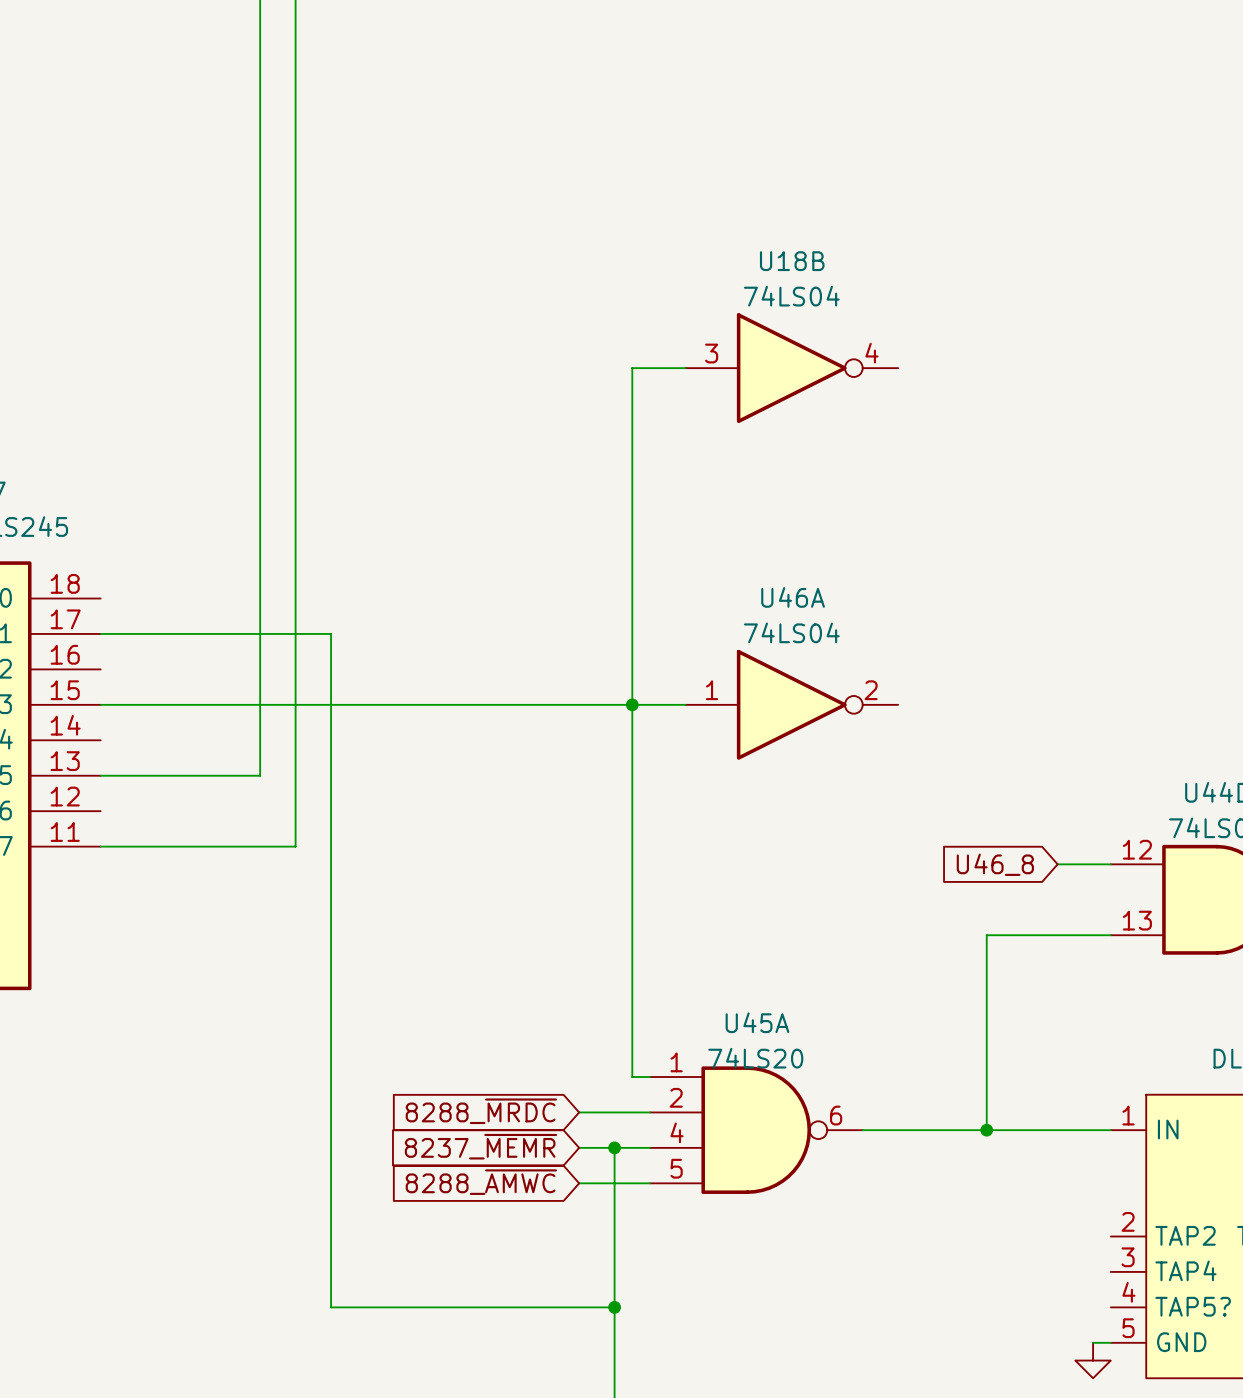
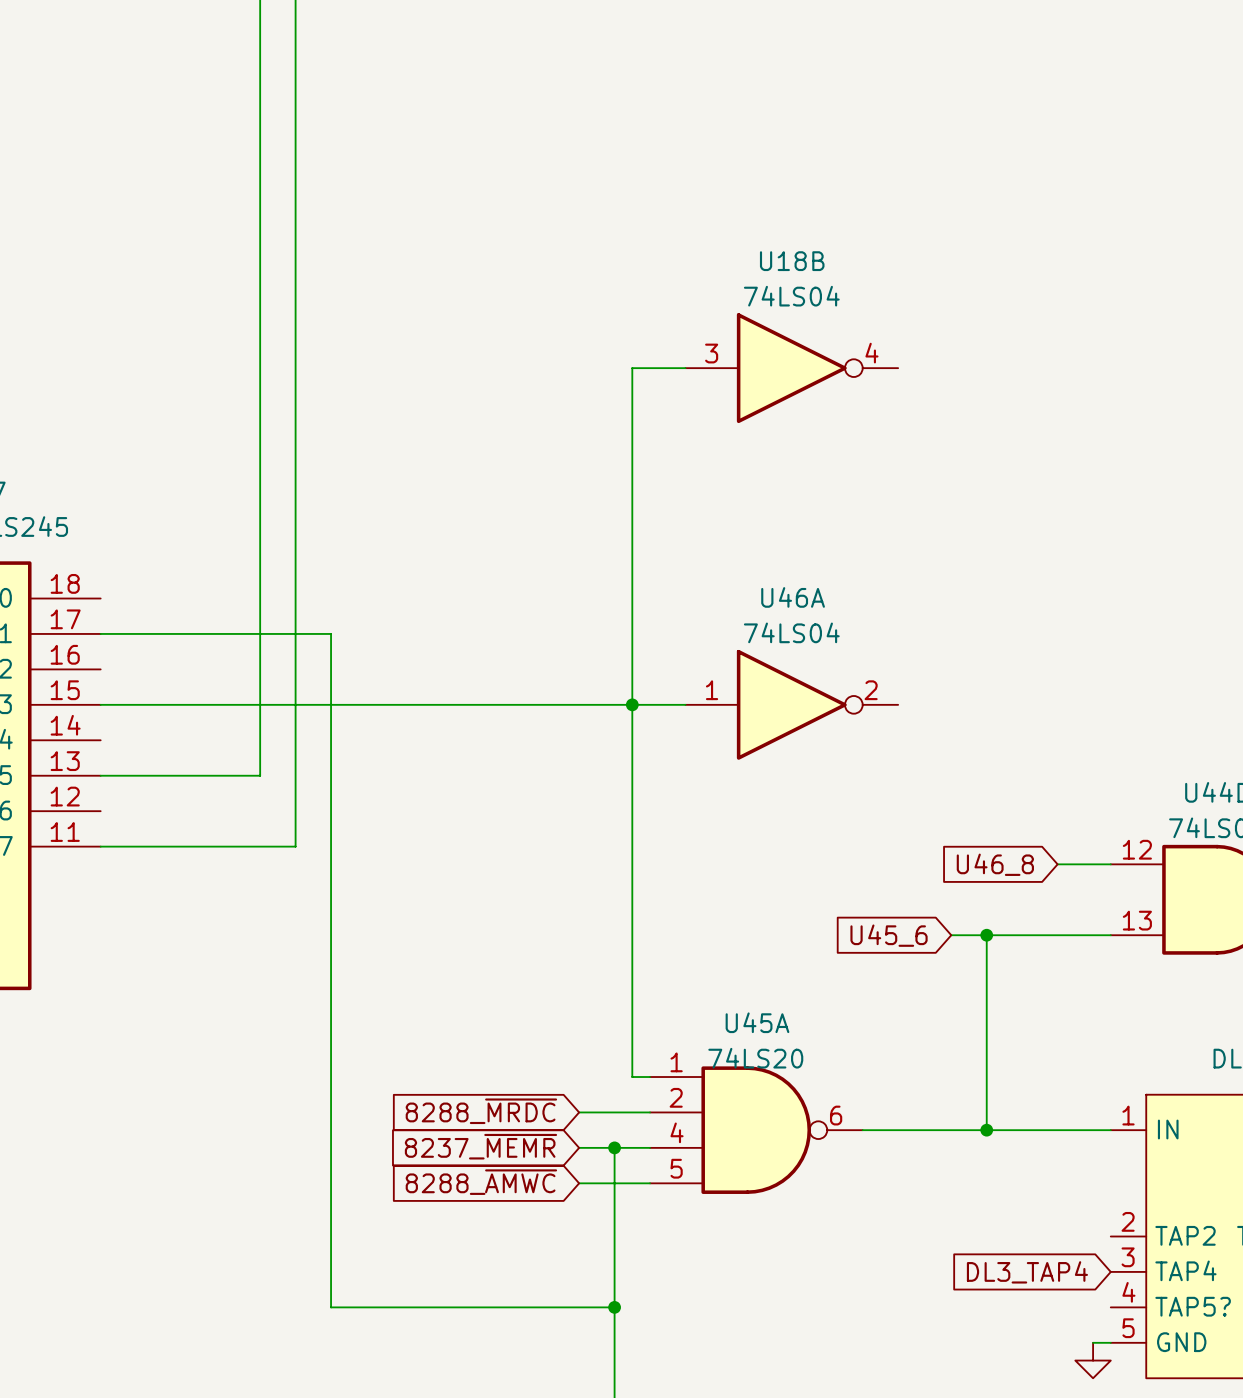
global label: none -> U45_6 (889, 935)
wire: none -> (951, 935) (986, 935)
junction: none -> (986, 935)
global label: none -> DL3_TAP4 (1027, 1272)

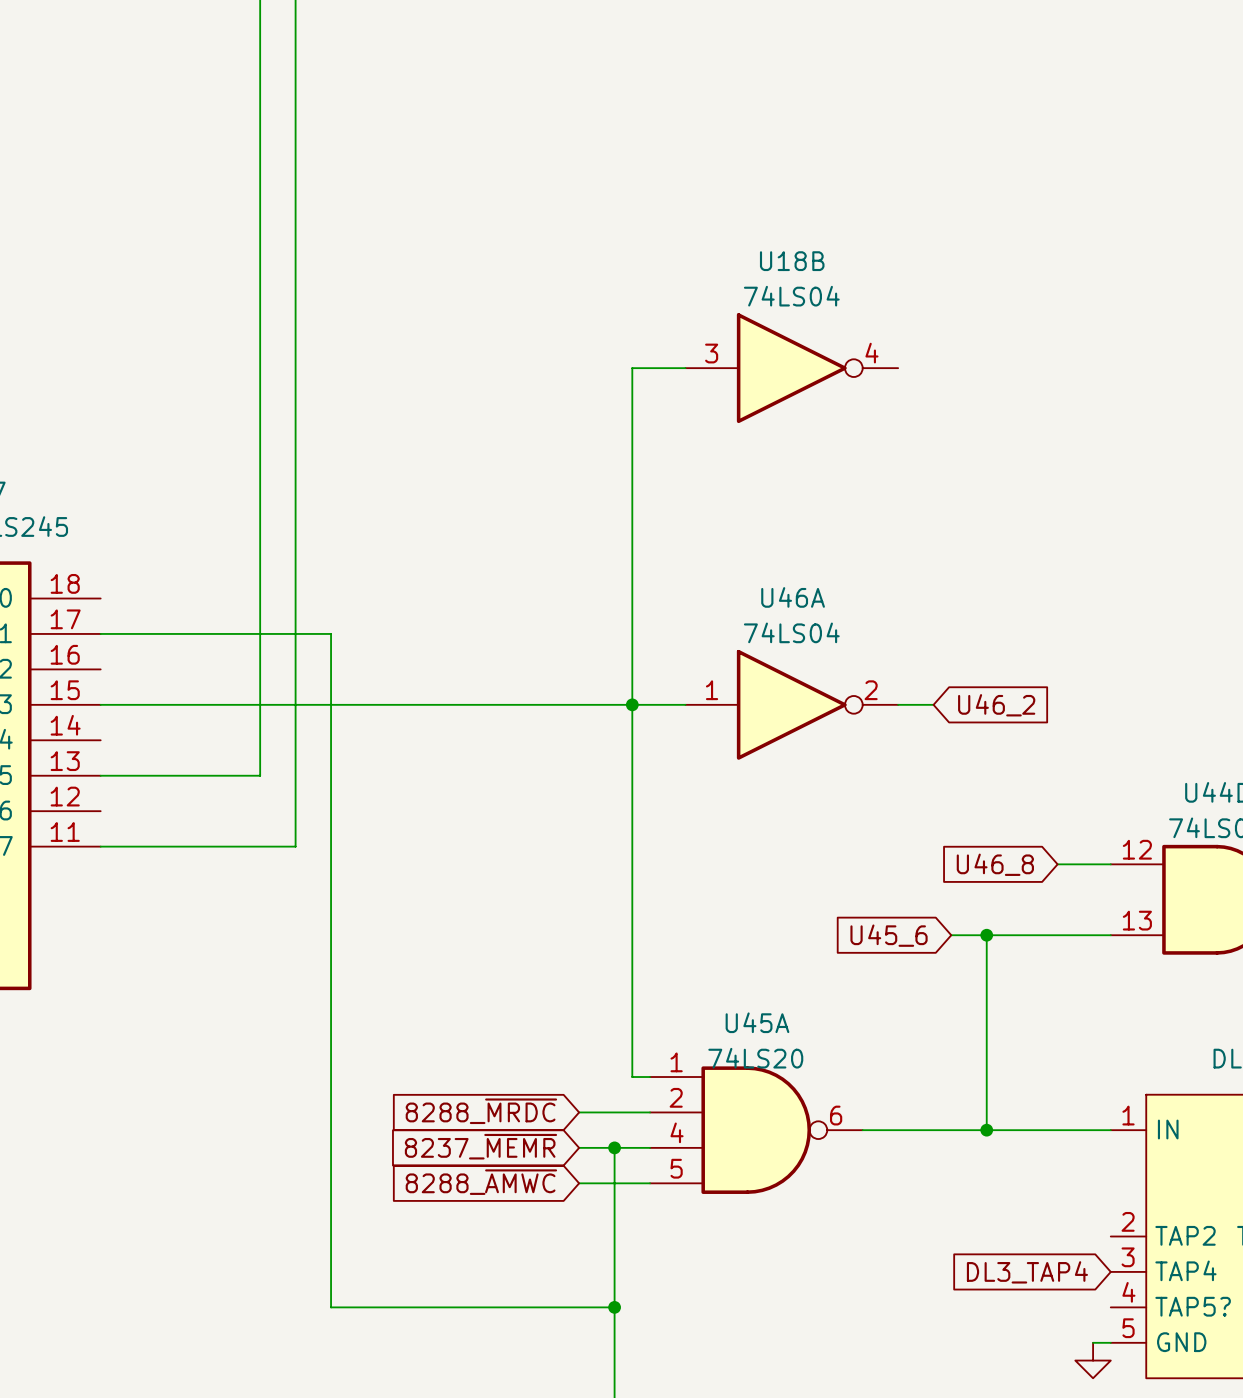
wire: none -> (898, 704) (933, 704)
global label: none -> U46_2 (996, 705)

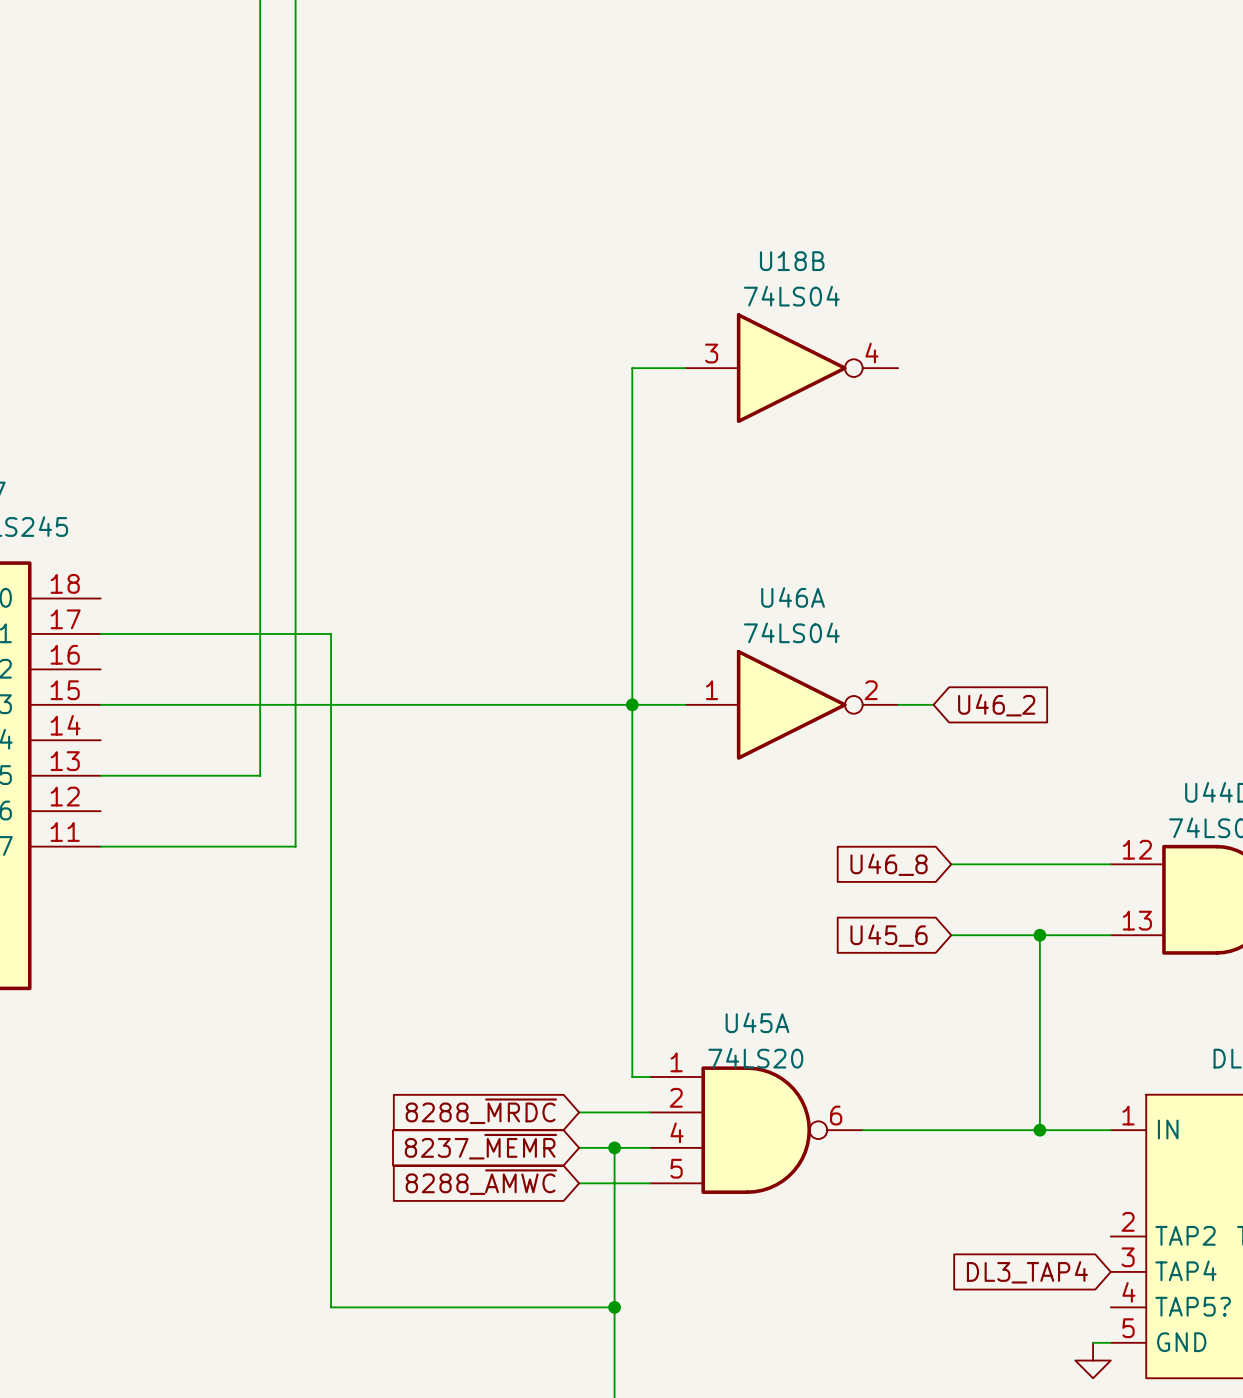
wire: none -> (951, 864) (1057, 864)
global label position: U46_8 (995, 864) -> U46_8 (889, 864)
wire: (986, 935) (986, 1130) -> (1039, 935) (1039, 1130)
junction position: (986, 935) -> (1039, 935)
junction position: (986, 1130) -> (1039, 1130)

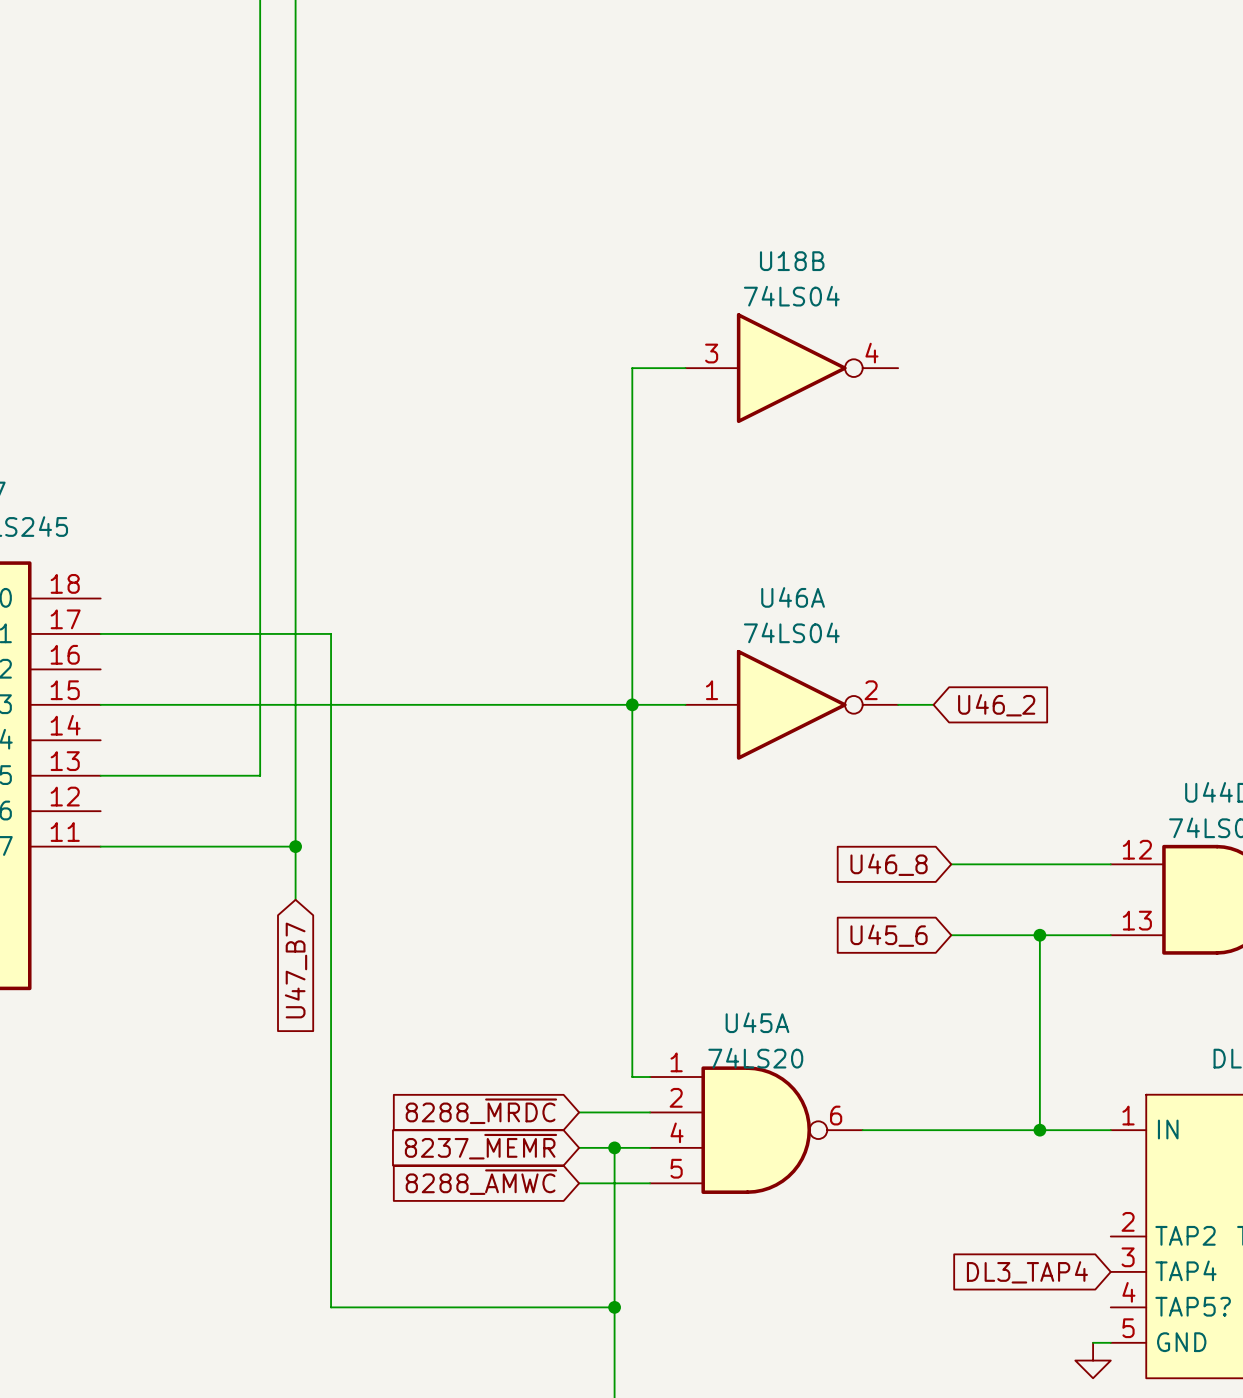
wire: none -> (295, 846) (295, 899)
junction: none -> (295, 846)
global label: none -> U47_B7 (296, 970)

